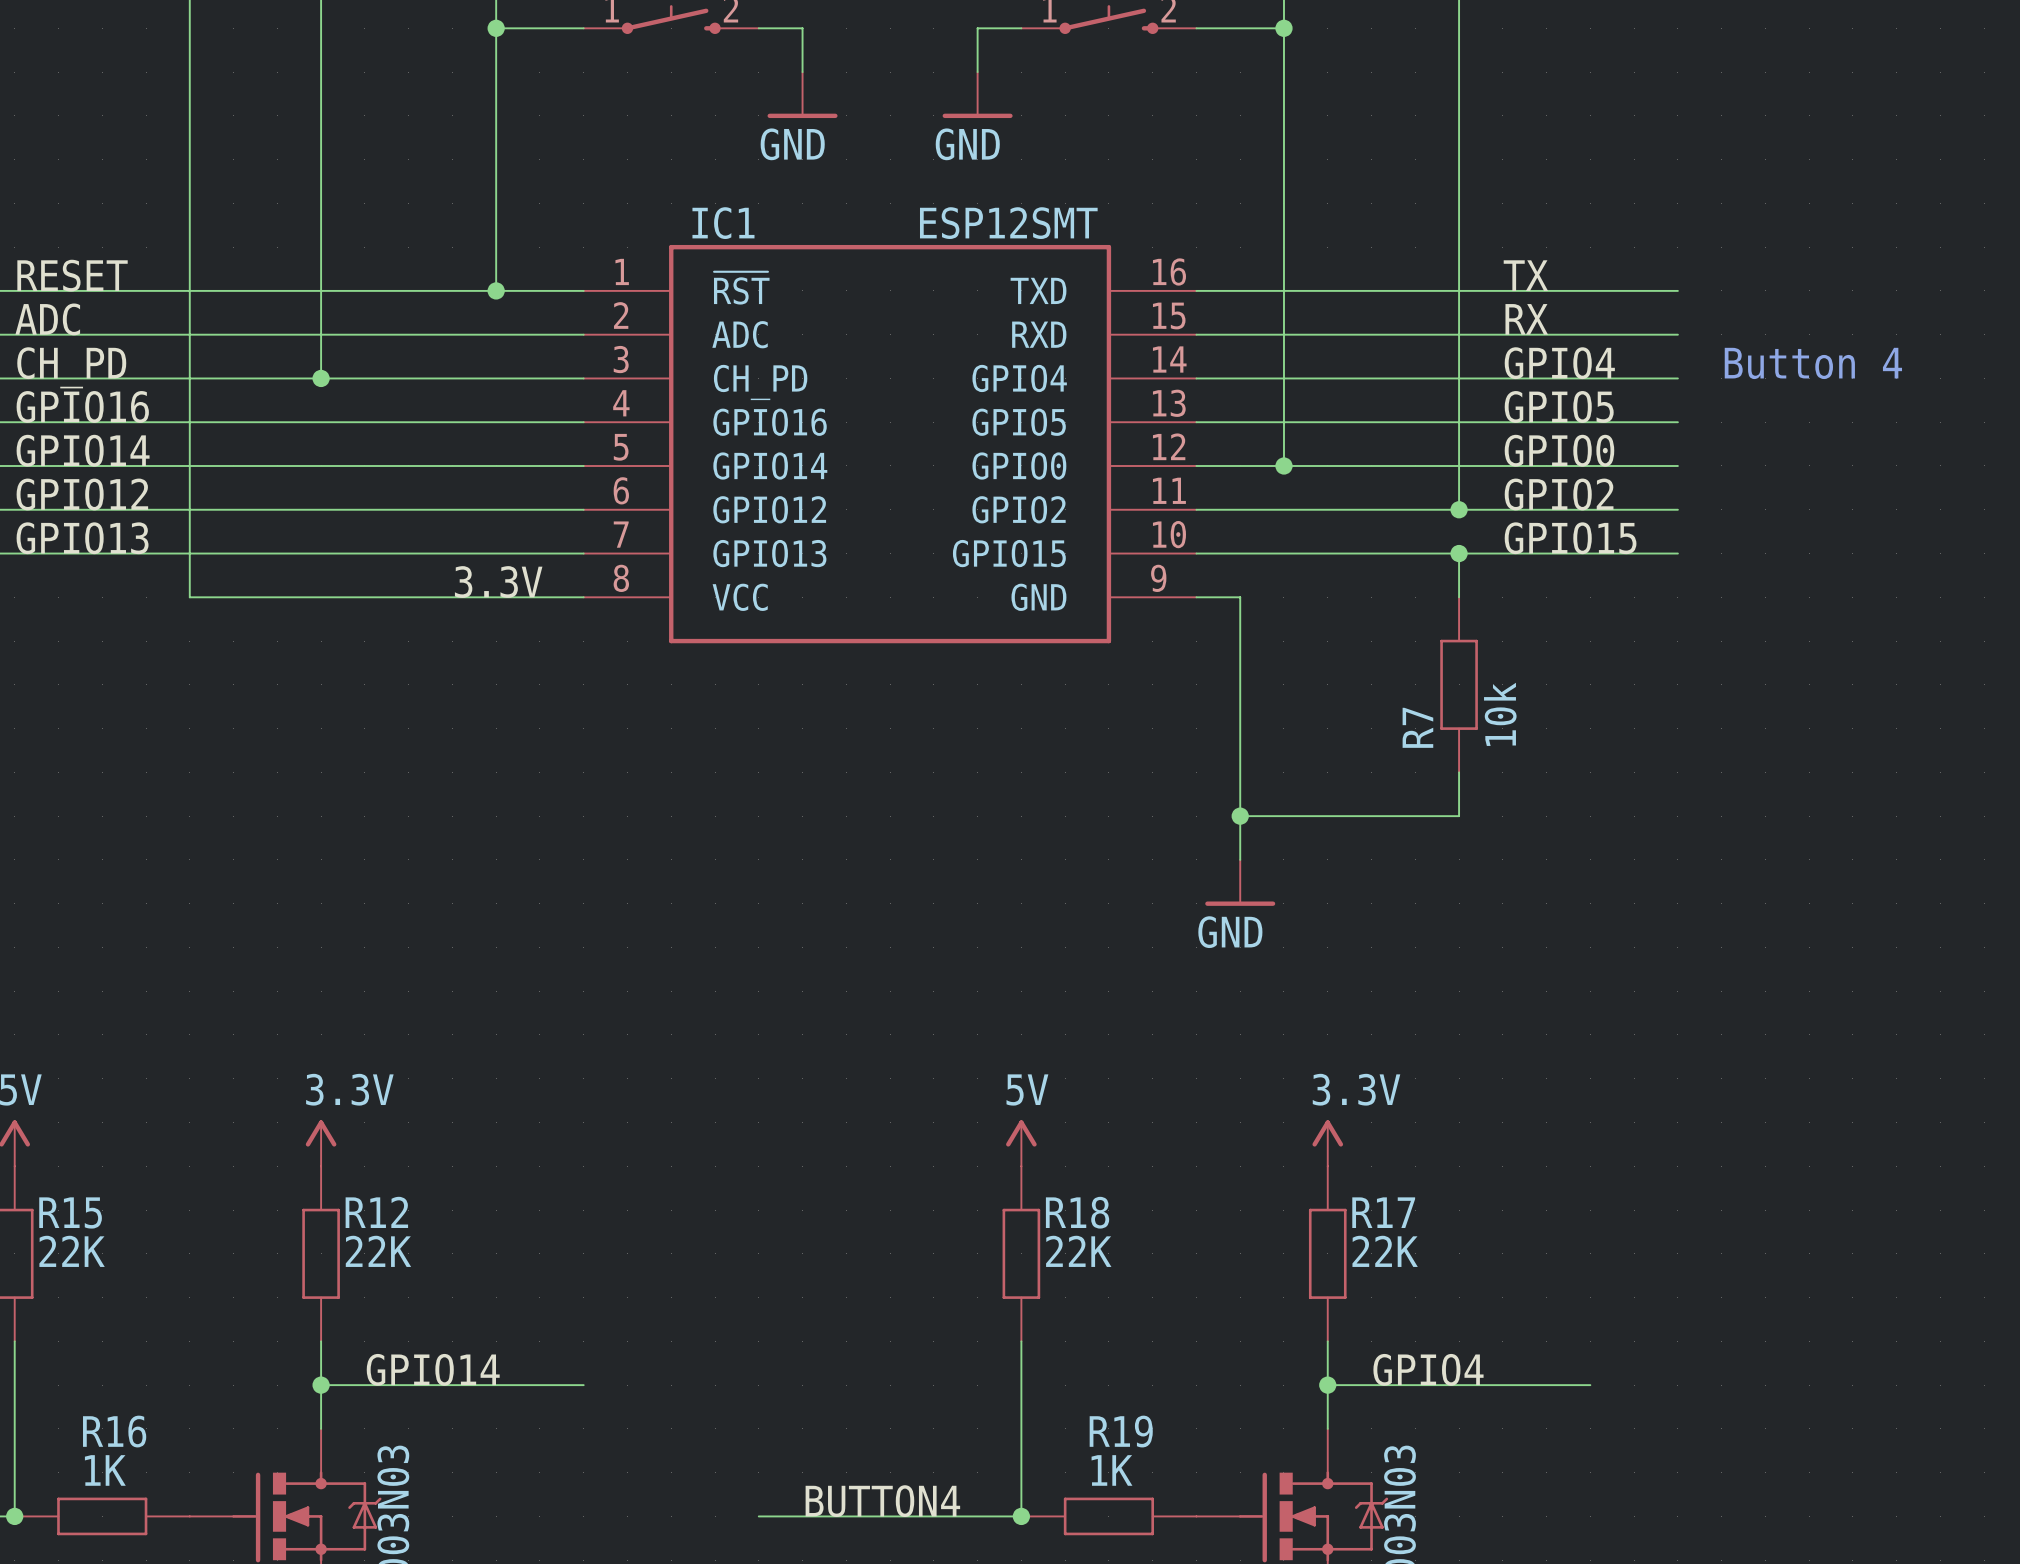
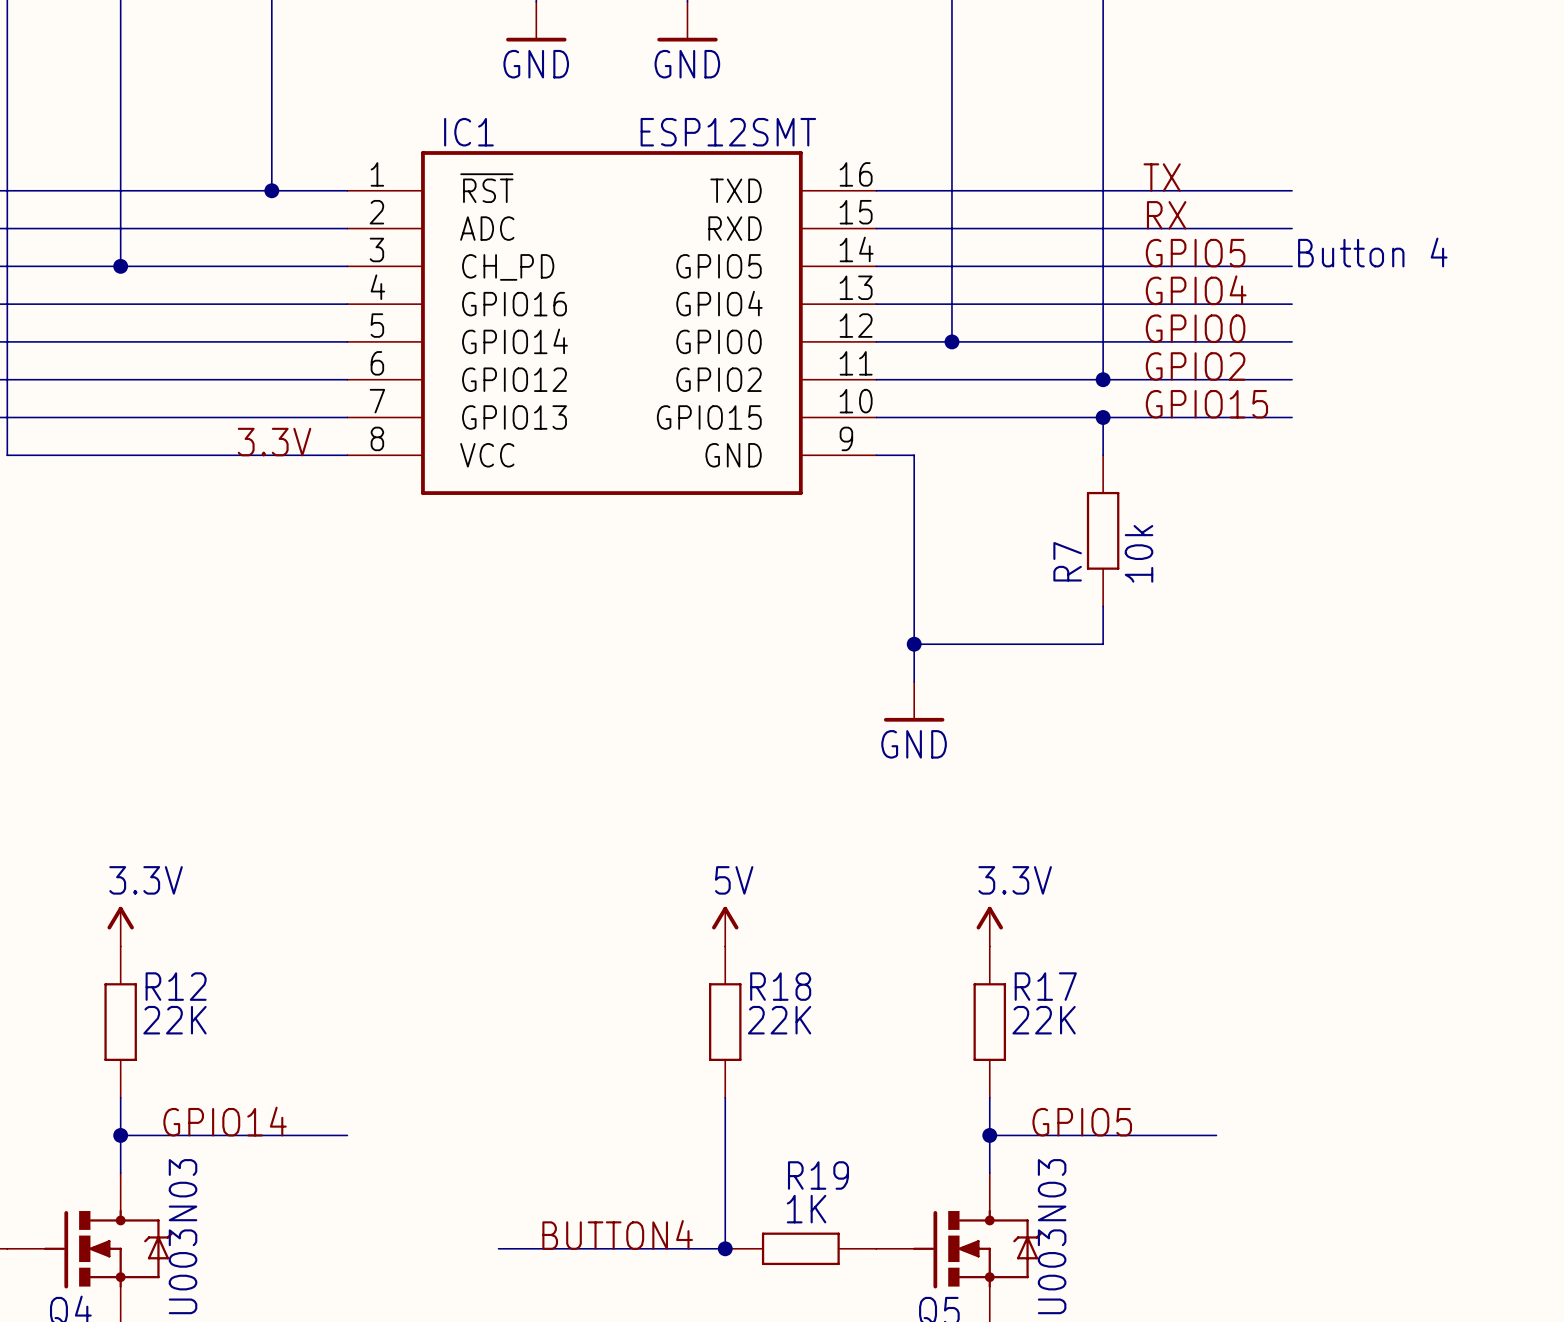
label: GPIO4 (1559, 363) -> GPIO5 (1195, 253)
text position: Button 4 (1813, 363) -> Button 4 (1372, 252)
IC1 pin name: GPIO4 (1019, 378) -> GPIO5 (719, 266)
label: GPIO5 (1559, 406) -> GPIO4 (1196, 290)
IC1 pin name: GPIO5 (1019, 422) -> GPIO4 (719, 303)
label: GPIO4 (1428, 1369) -> GPIO5 (1082, 1122)

